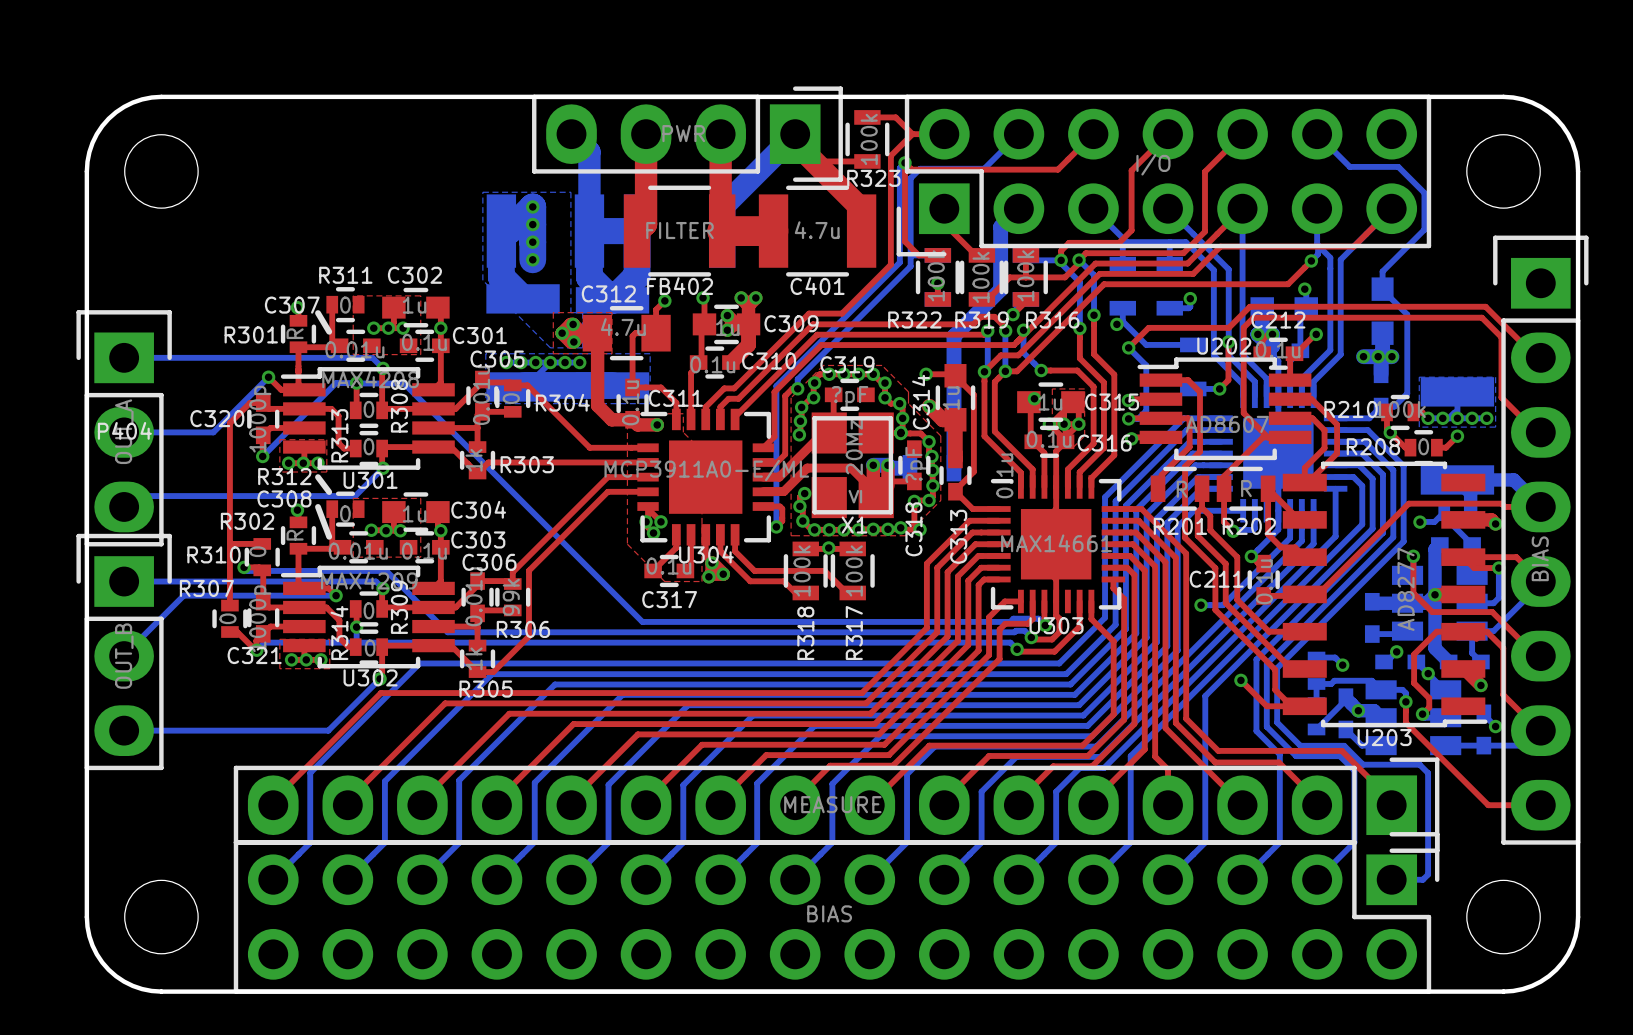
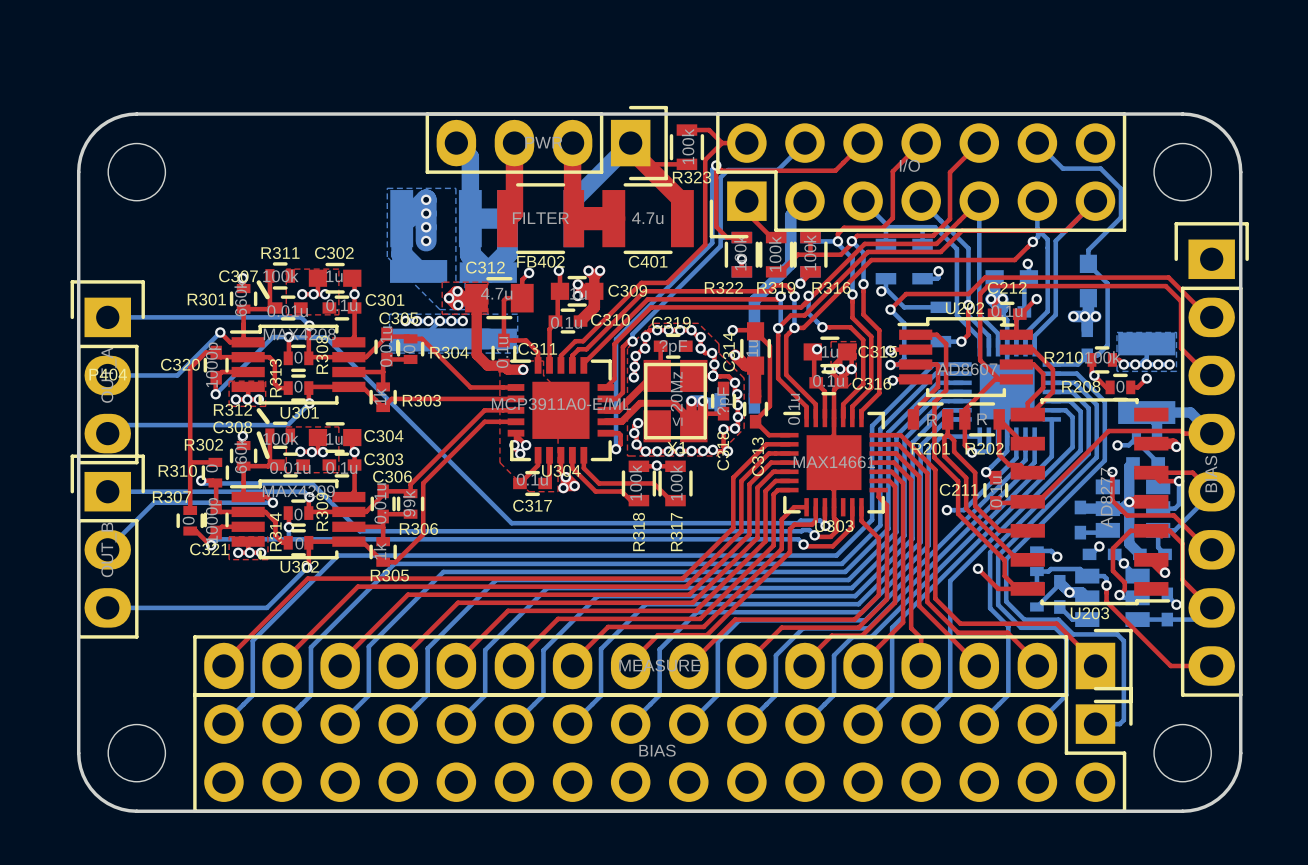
R311 value: 0 (345, 305) -> 100k (280, 276)
R301 value: R (295, 333) -> 660k (240, 298)
R312 value: 0 (345, 513) -> 100k (280, 438)
R302 value: R (295, 535) -> 660k (240, 455)

